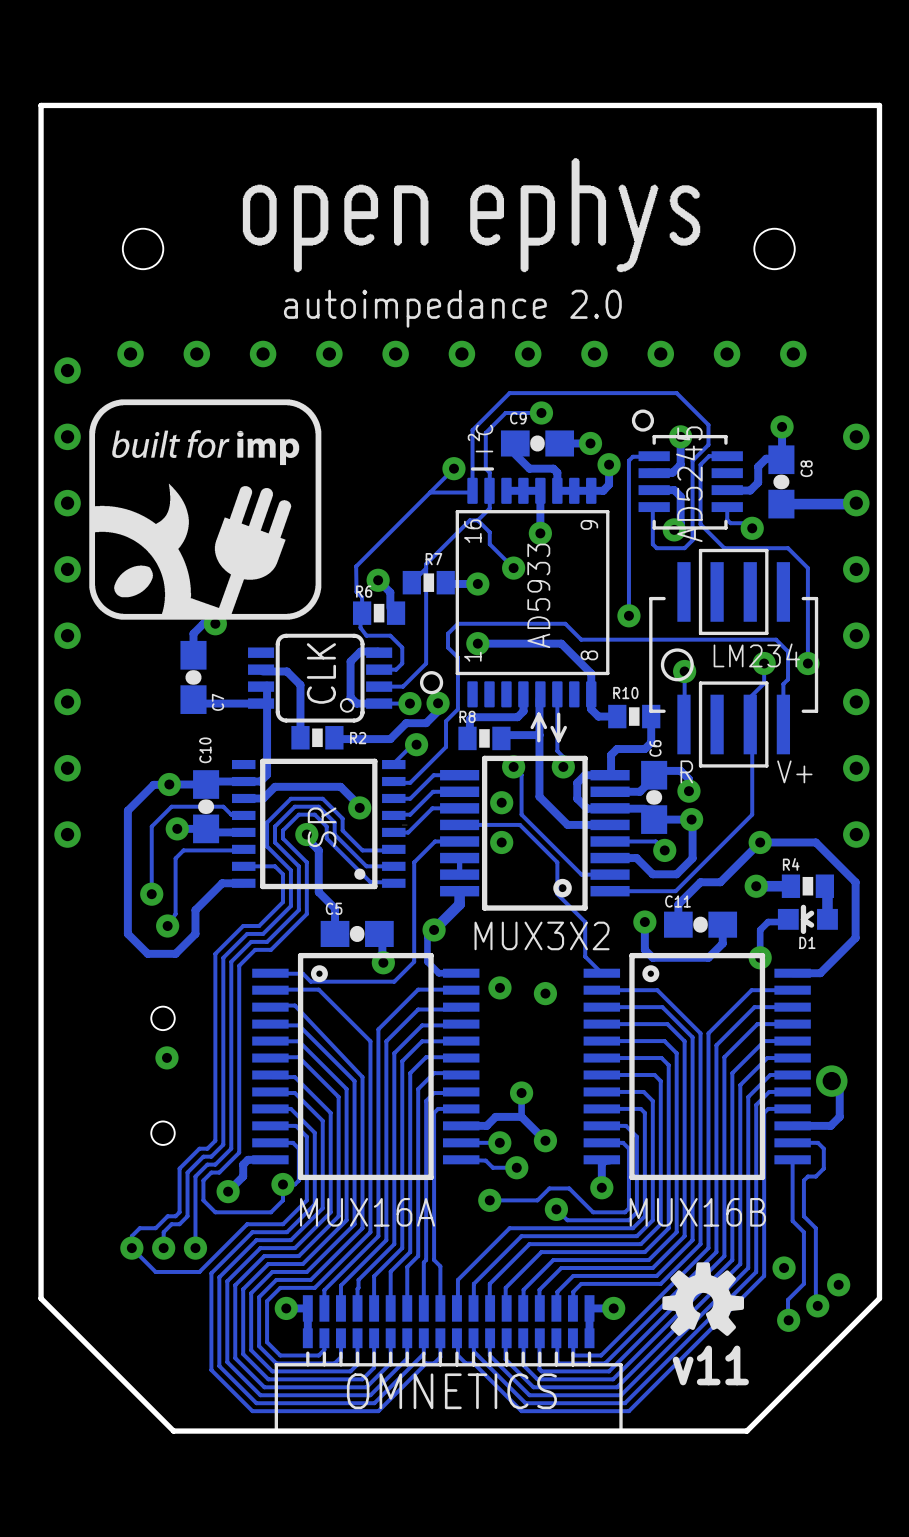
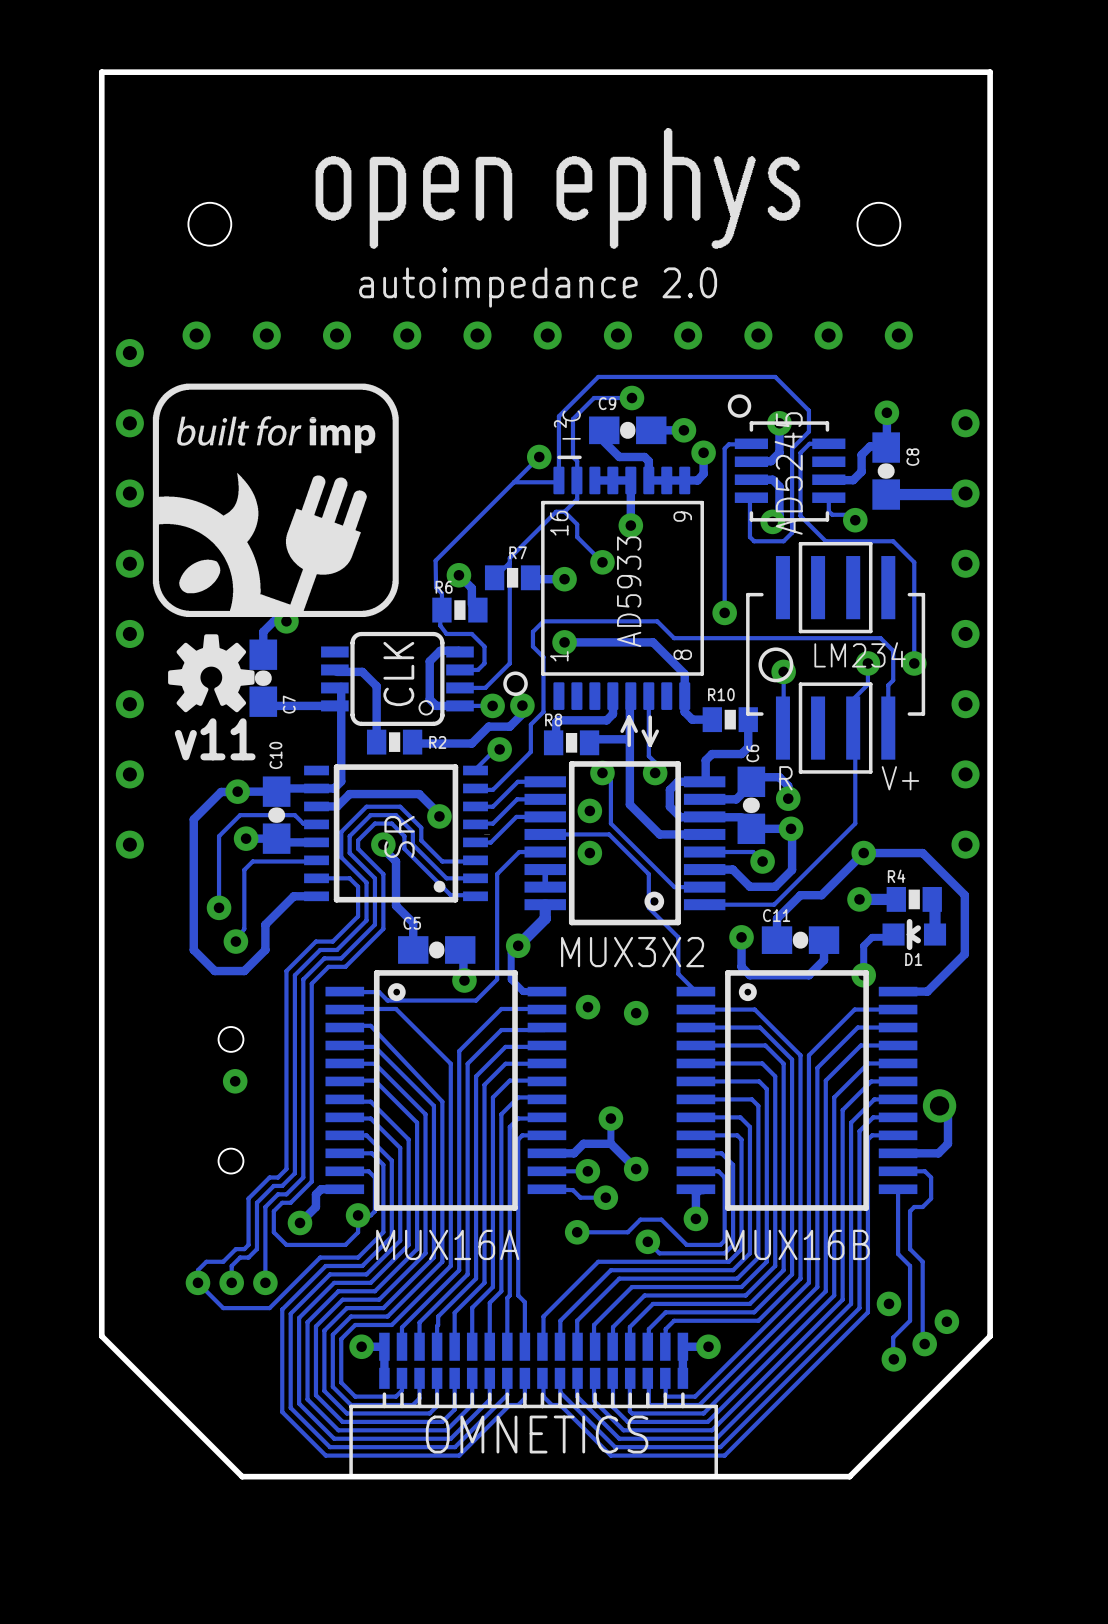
drawing: none -> [168, 634, 255, 713]
text: none -> v11 (215, 739)
drawing: [662, 1262, 744, 1336] -> none
text: v11 (710, 1365) -> none

